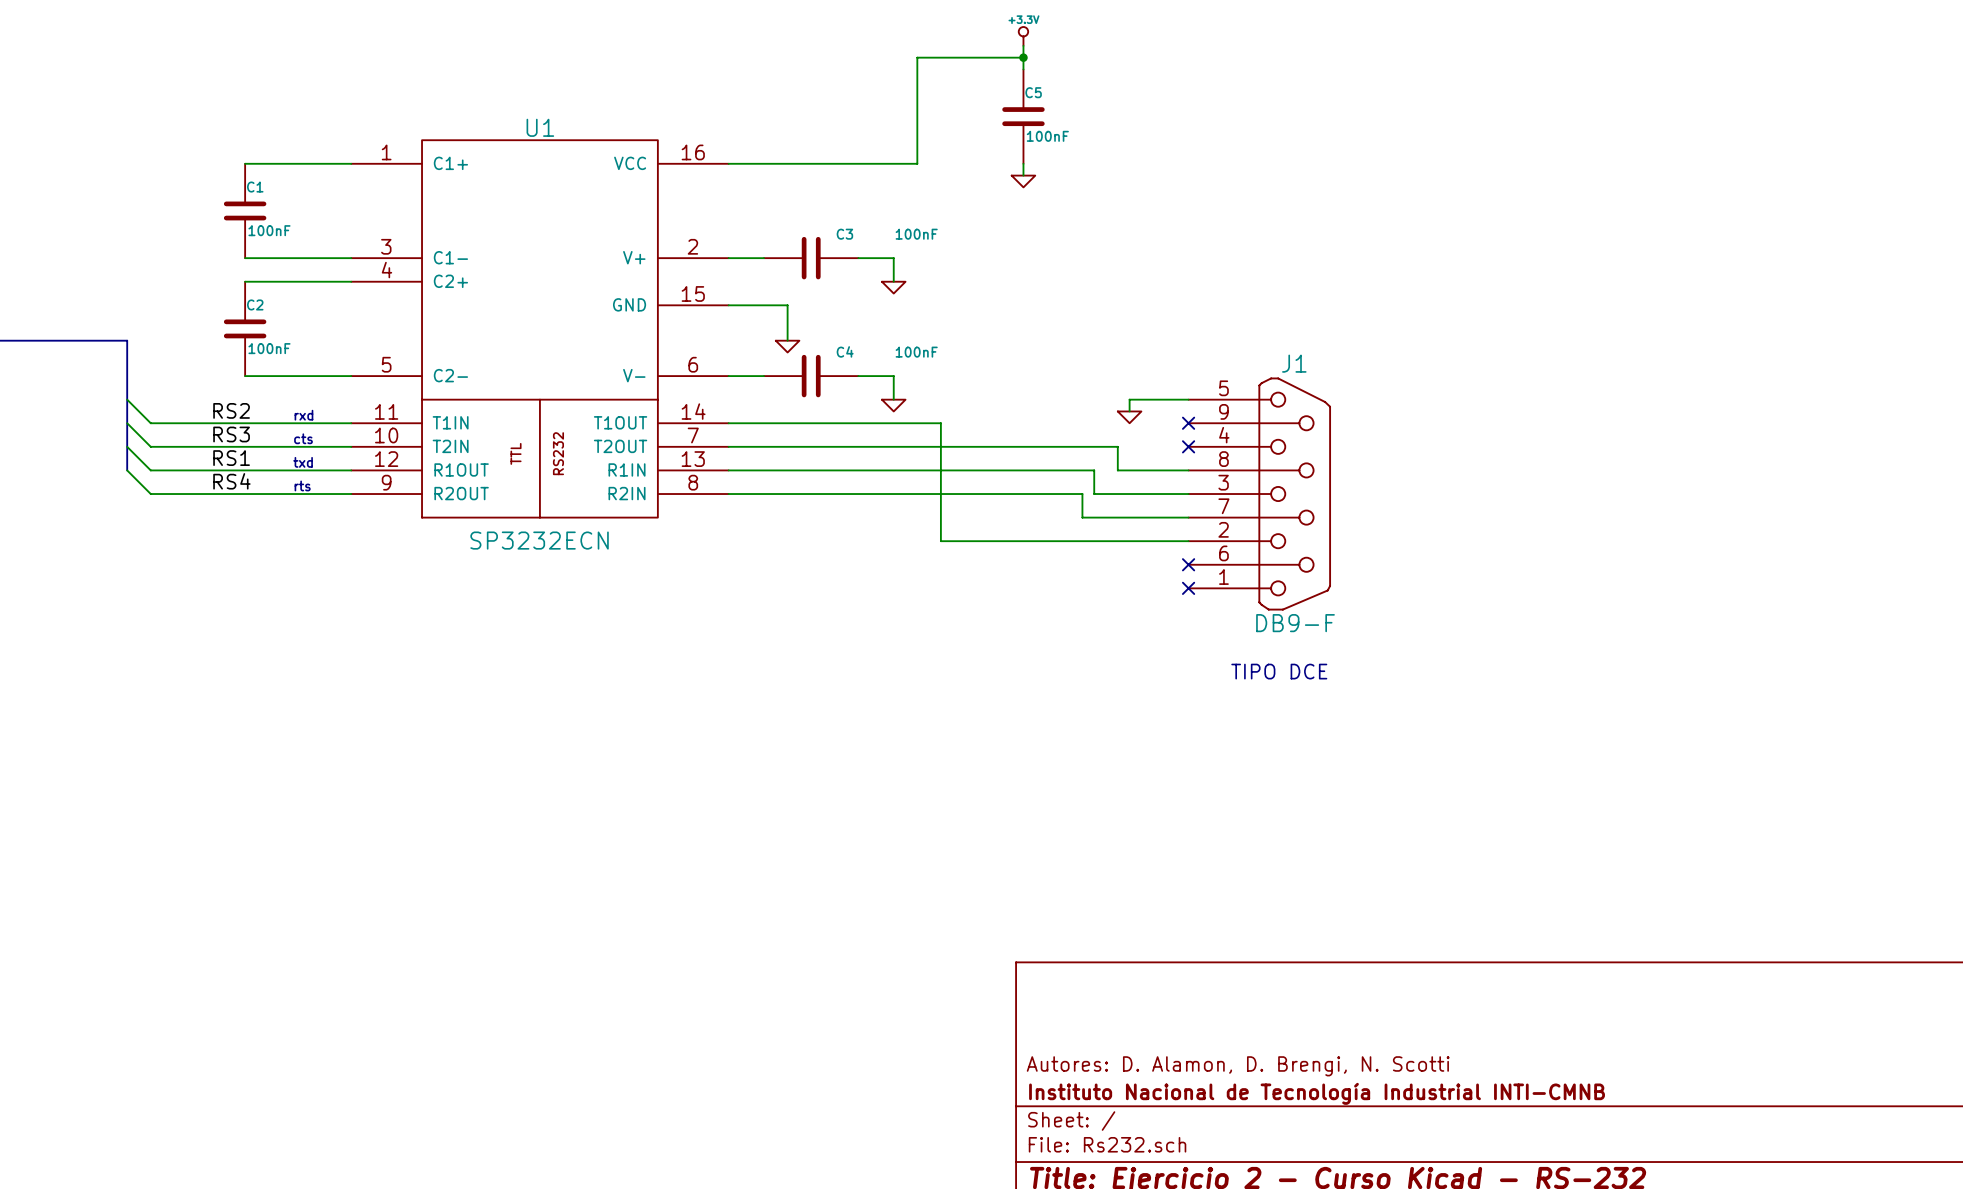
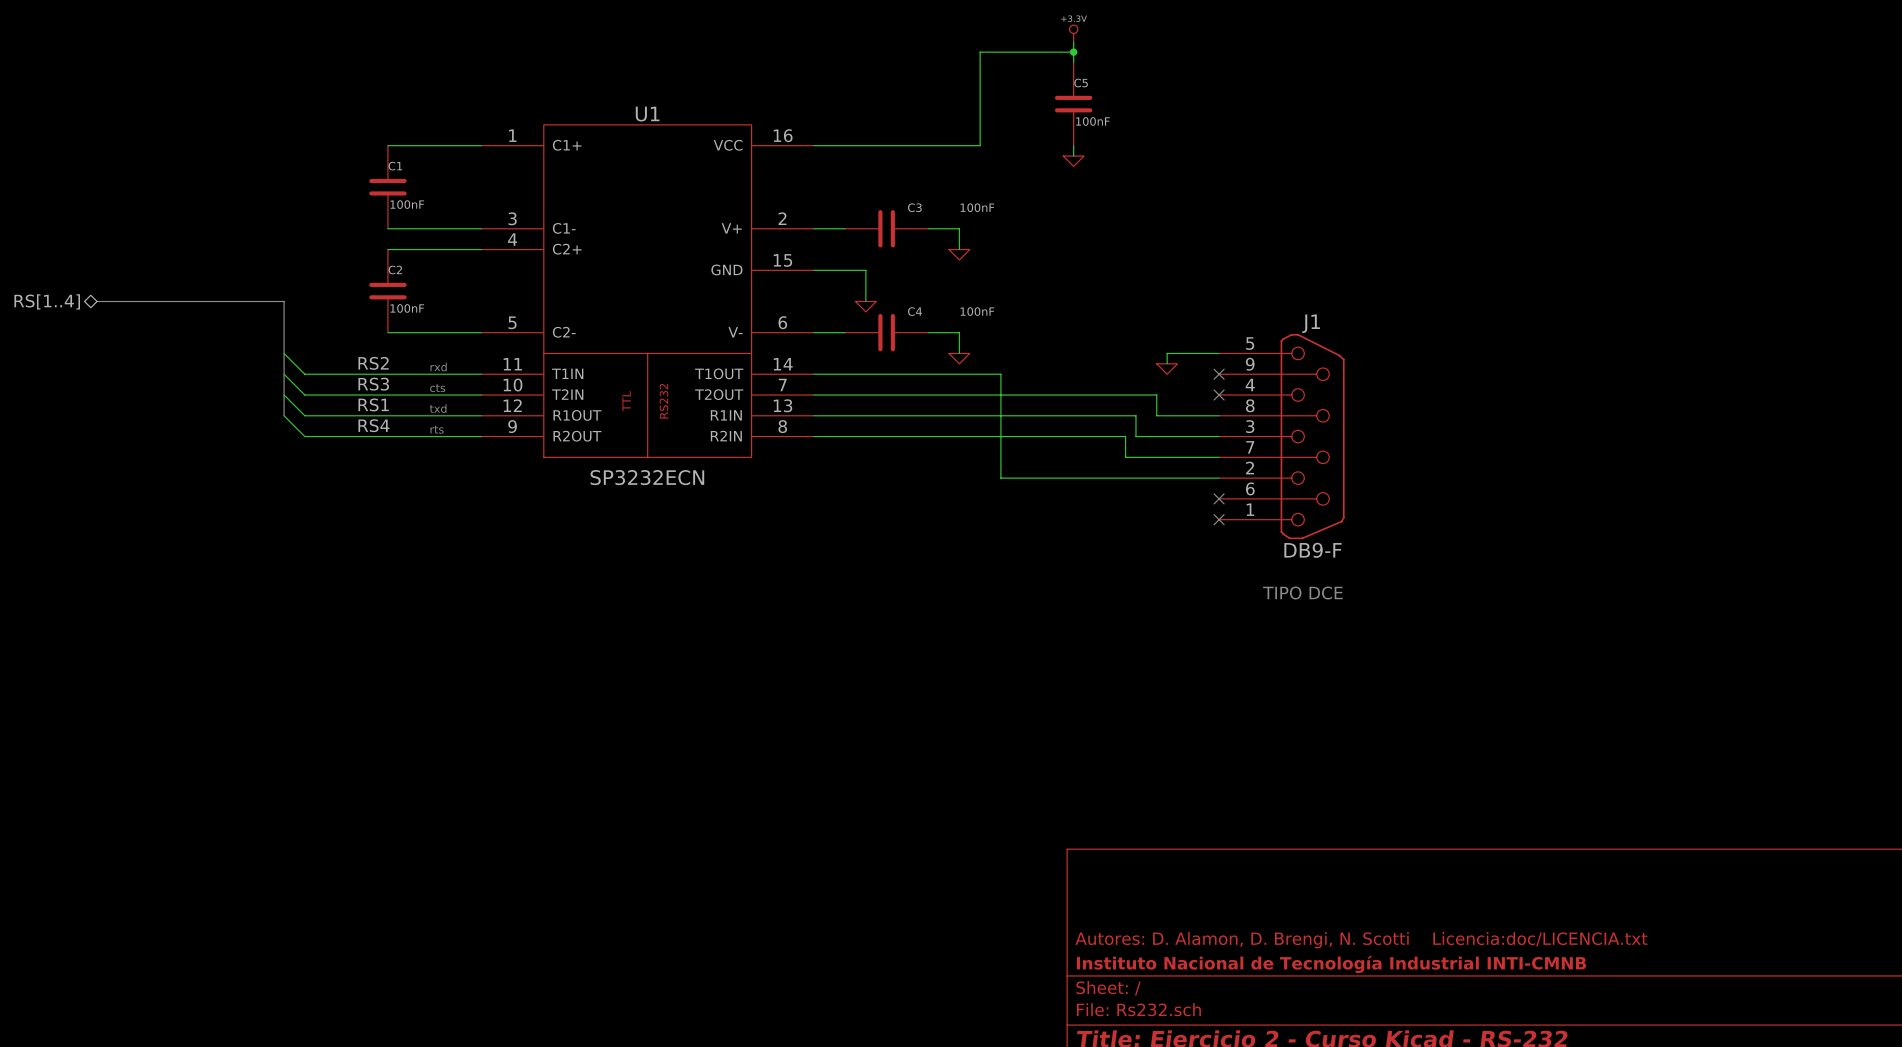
title block: Autores: D. Alamon, D. Brengi, N. Scotti (1238, 1066) -> Autores: D. Alamon, D. Brengi, N. Scotti Licencia:doc/LICENCIA.txt (1361, 940)

